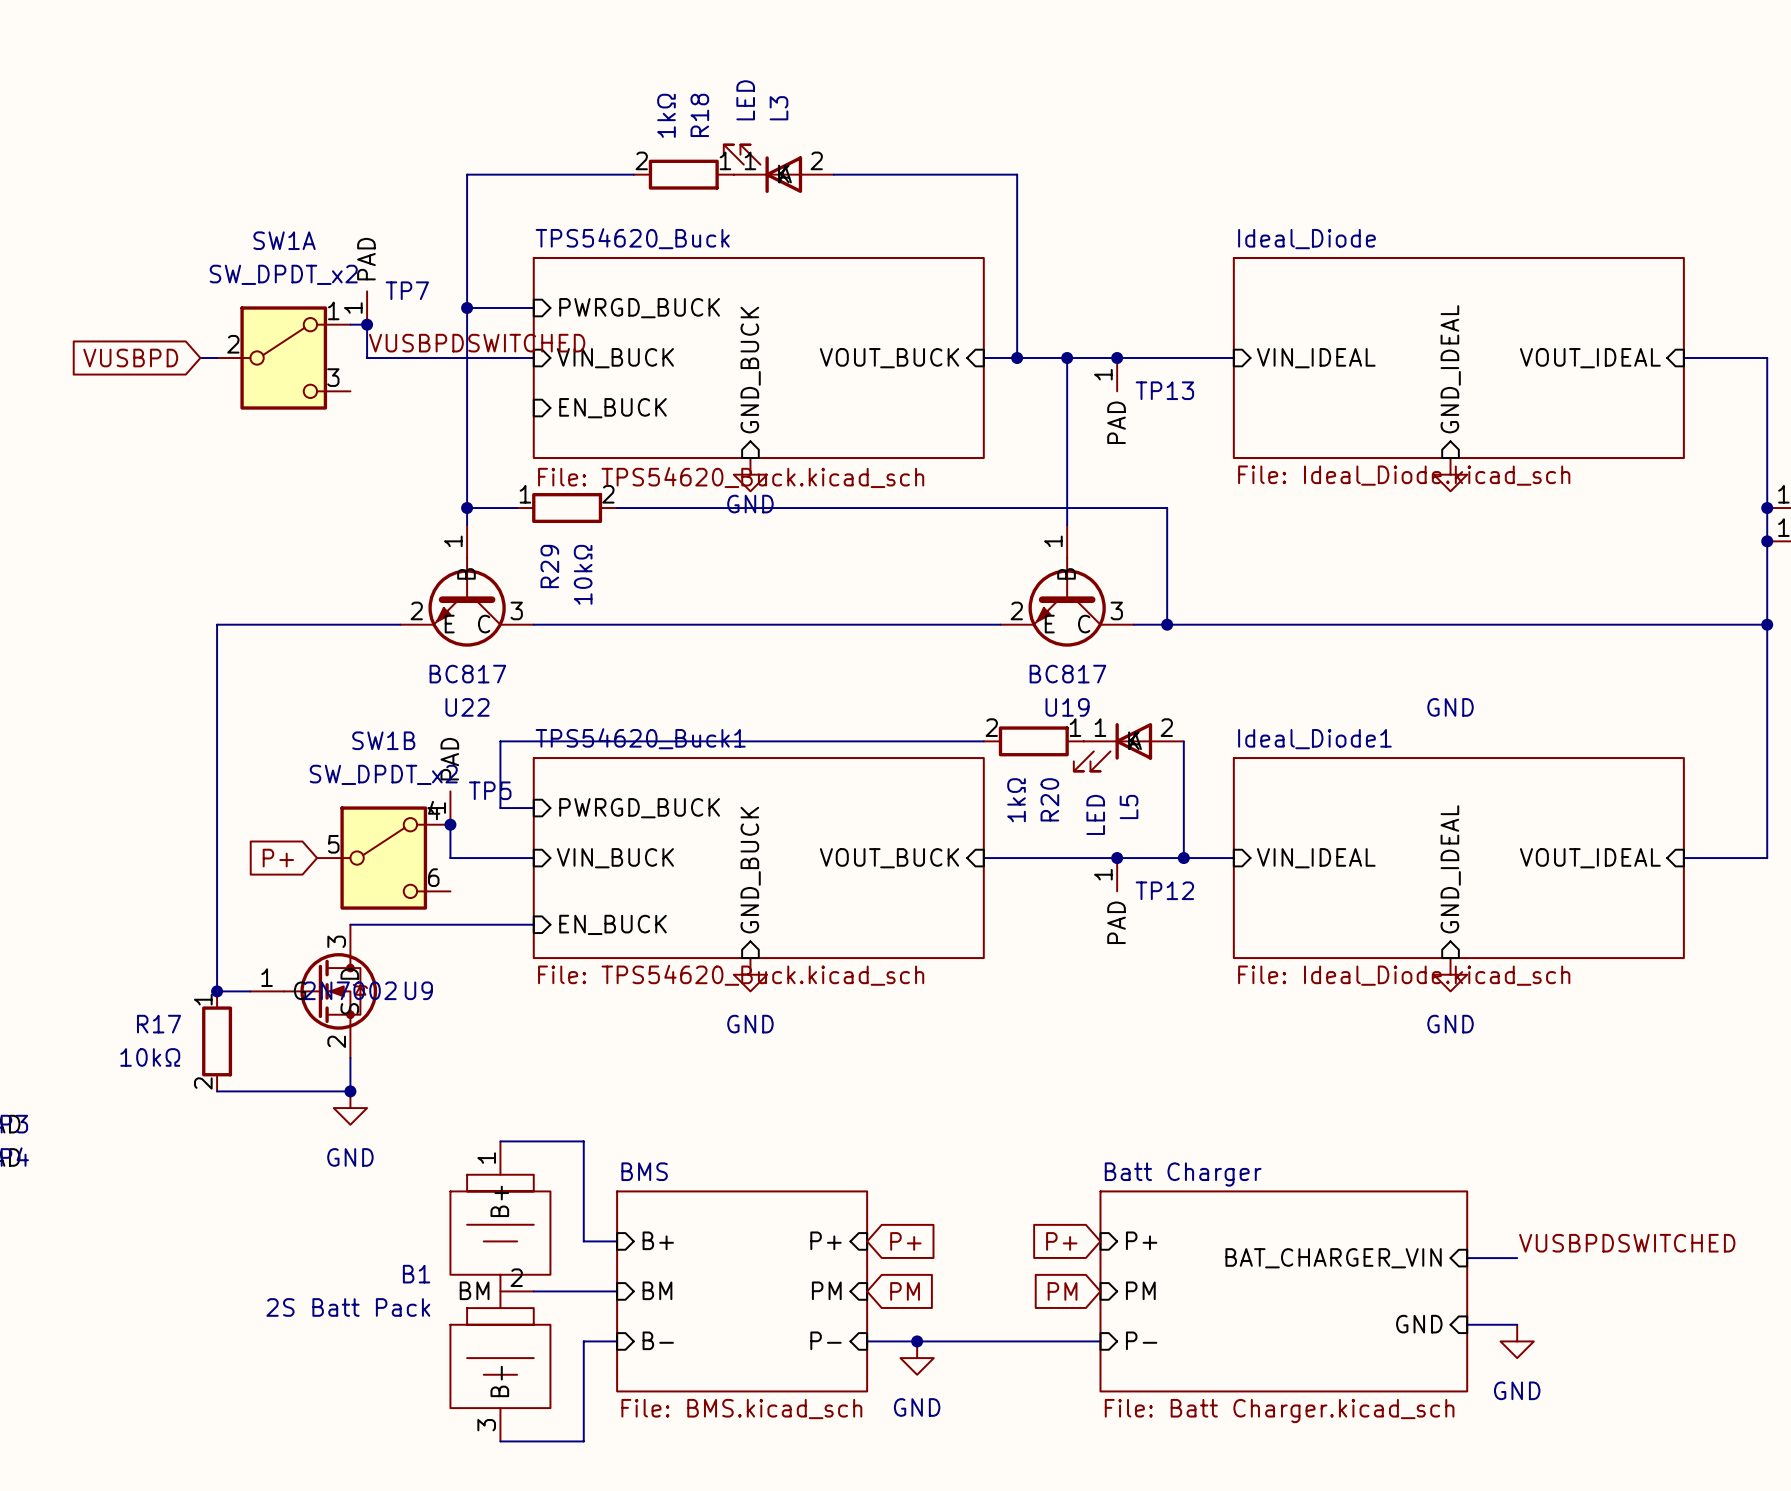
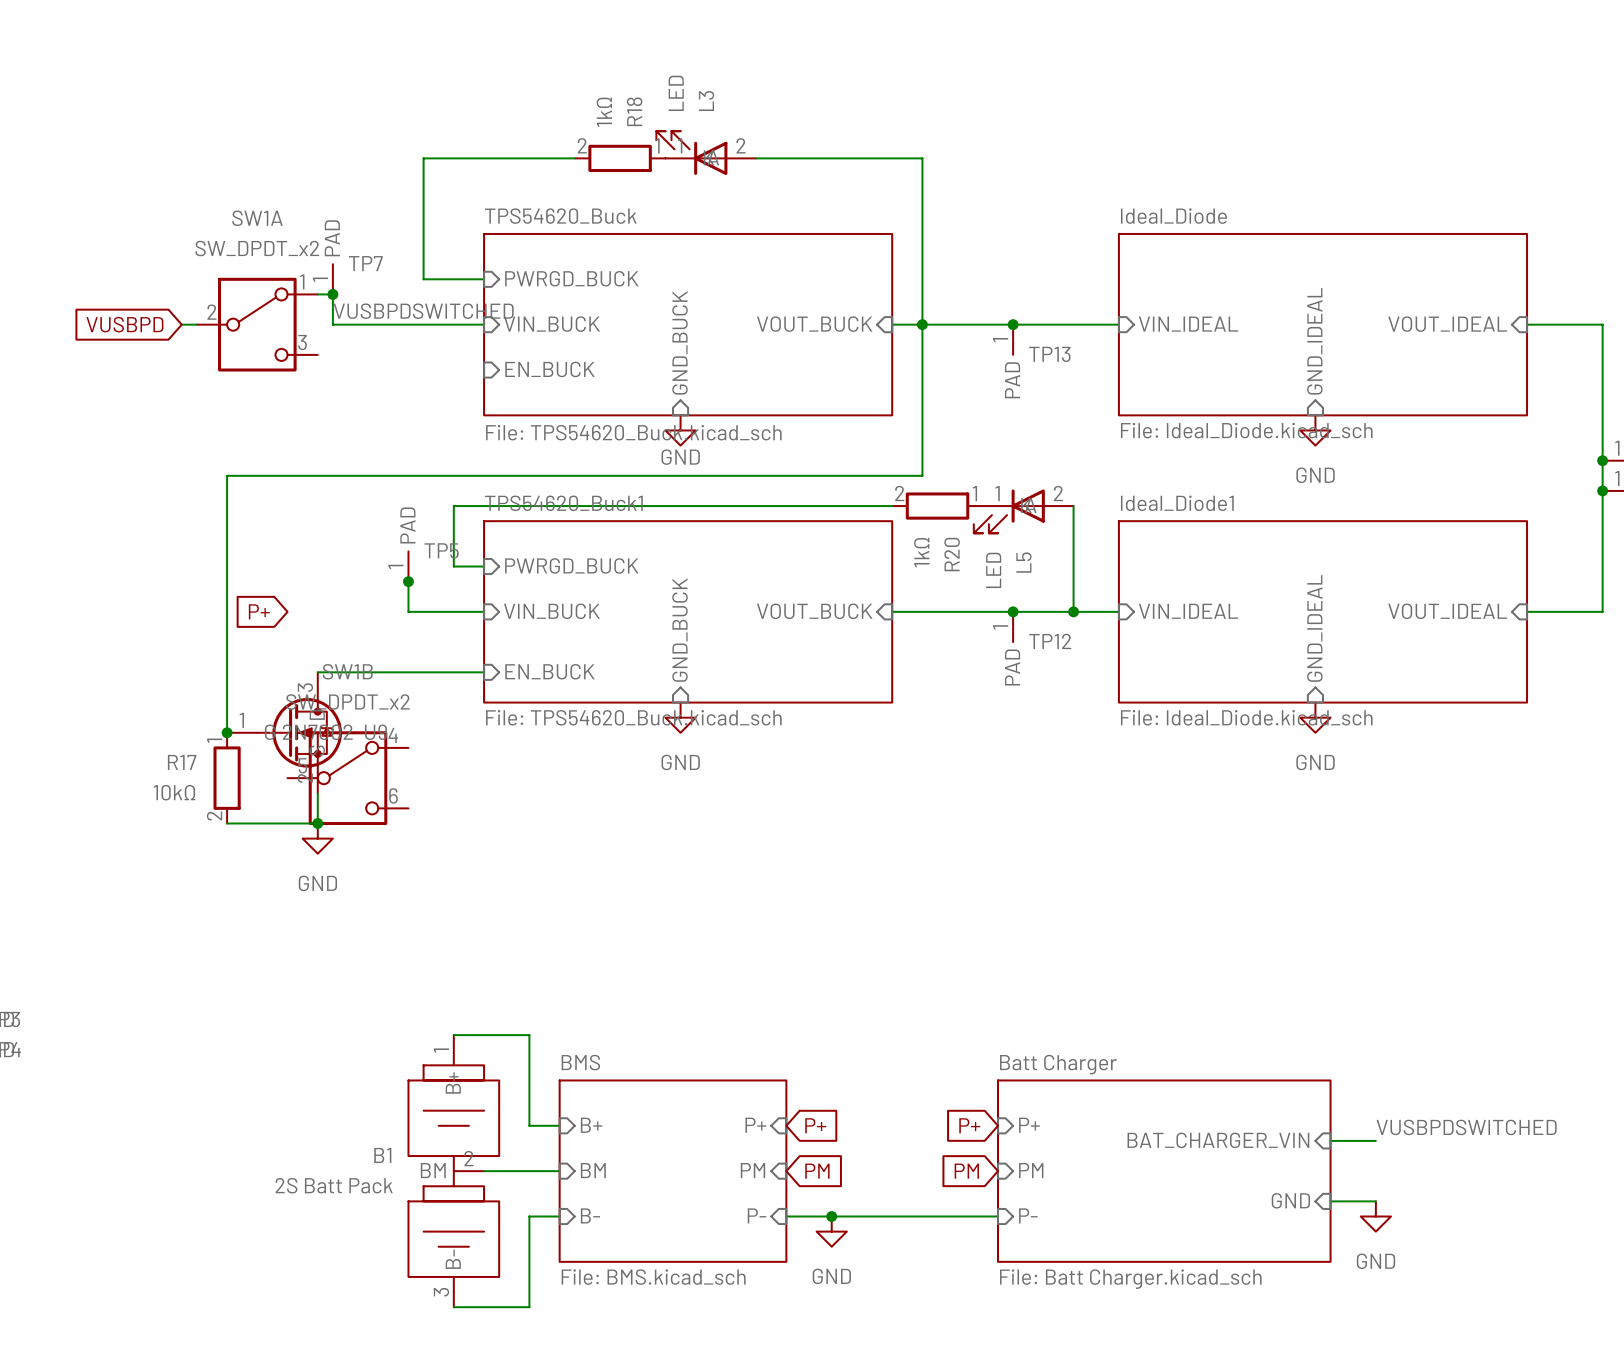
wire: (467, 308) (467, 524) -> none
junction: (467, 308) -> none
wire: none -> (922, 324) (922, 475) (227, 475) (227, 732)
wire: (1067, 358) (1067, 524) -> none
junction: (1067, 358) -> none
wire: (467, 508) (517, 508) -> none
junction: (467, 508) -> none
R29: 10kΩ (567, 508) -> none
wire: (617, 508) (1167, 508) (1167, 624) -> none
U22: BC817 (467, 585) -> none
U19: BC817 (1067, 585) -> none
wire: (400, 624) (217, 624) (217, 991) (250, 991) -> none
wire: (533, 624) (1000, 624) -> (484, 566) (453, 566) (453, 506) (892, 506)
wire: (1133, 624) (1767, 624) -> none
junction: (1167, 624) -> none
junction: (1767, 624) -> none
junction: none -> (408, 581)
junction: none -> (1013, 611)
junction: none -> (1073, 611)
wire: (1767, 674) (1767, 858) (1683, 858) -> (1602, 611) (1527, 611)
power symbol text position: GND (1450, 707) -> GND (1315, 475)
wire: (500, 741) (500, 808) (533, 808) -> (453, 672) (317, 672)
wire: (533, 741) (983, 741) -> none
R20 position: (1033, 741) -> (937, 506)
wire: (1183, 741) (1183, 858) -> (1073, 506) (1073, 611)
L5 position: (1128, 747) -> (1023, 511)
junction: none -> (227, 732)
TP5 position: (450, 808) -> (408, 566)
sheet pin position: PWRGD_BUCK (639, 808) -> PWRGD_BUCK (571, 565)
wire: (450, 824) (450, 858) (533, 858) -> (408, 581) (408, 611) (484, 611)
junction: (450, 824) -> none
global label position: P+ (278, 858) -> P+ (259, 611)
sheet pin position: VIN_BUCK (615, 858) -> VIN_BUCK (551, 611)
sheet TPS54620_Buck1 position: (758, 858) -> (688, 611)
sheet pin position: VOUT_BUCK (889, 858) -> VOUT_BUCK (814, 611)
wire: (983, 858) (1233, 858) -> (892, 611) (1118, 611)
junction: (1117, 858) -> none
junction: (1183, 858) -> none
sheet pin position: VIN_IDEAL (1316, 858) -> VIN_IDEAL (1188, 611)
sheet Ideal_Diode1 position: (1458, 858) -> (1322, 611)
sheet pin position: VOUT_IDEAL (1590, 858) -> VOUT_IDEAL (1447, 611)
sheet pin position: GND_IDEAL (1450, 869) -> GND_IDEAL (1314, 628)
sheet pin position: GND_BUCK (750, 870) -> GND_BUCK (680, 630)
wire: none -> (317, 793) (317, 823) (227, 823)
TP12 position: (1117, 874) -> (1013, 626)
junction: none -> (317, 823)
wire: (350, 924) (533, 924) -> none
sheet pin position: EN_BUCK (613, 924) -> EN_BUCK (549, 671)
power symbol position: GND (750, 974) -> GND (680, 717)
power symbol position: GND (1450, 974) -> GND (1315, 717)
junction: (217, 991) -> none
U9 position: (313, 991) -> (284, 732)
R17 position: (217, 1041) -> (227, 778)
wire: (350, 1058) (350, 1091) (217, 1091) -> none
junction: (350, 1091) -> none
power symbol position: GND (350, 1108) -> GND (317, 838)

